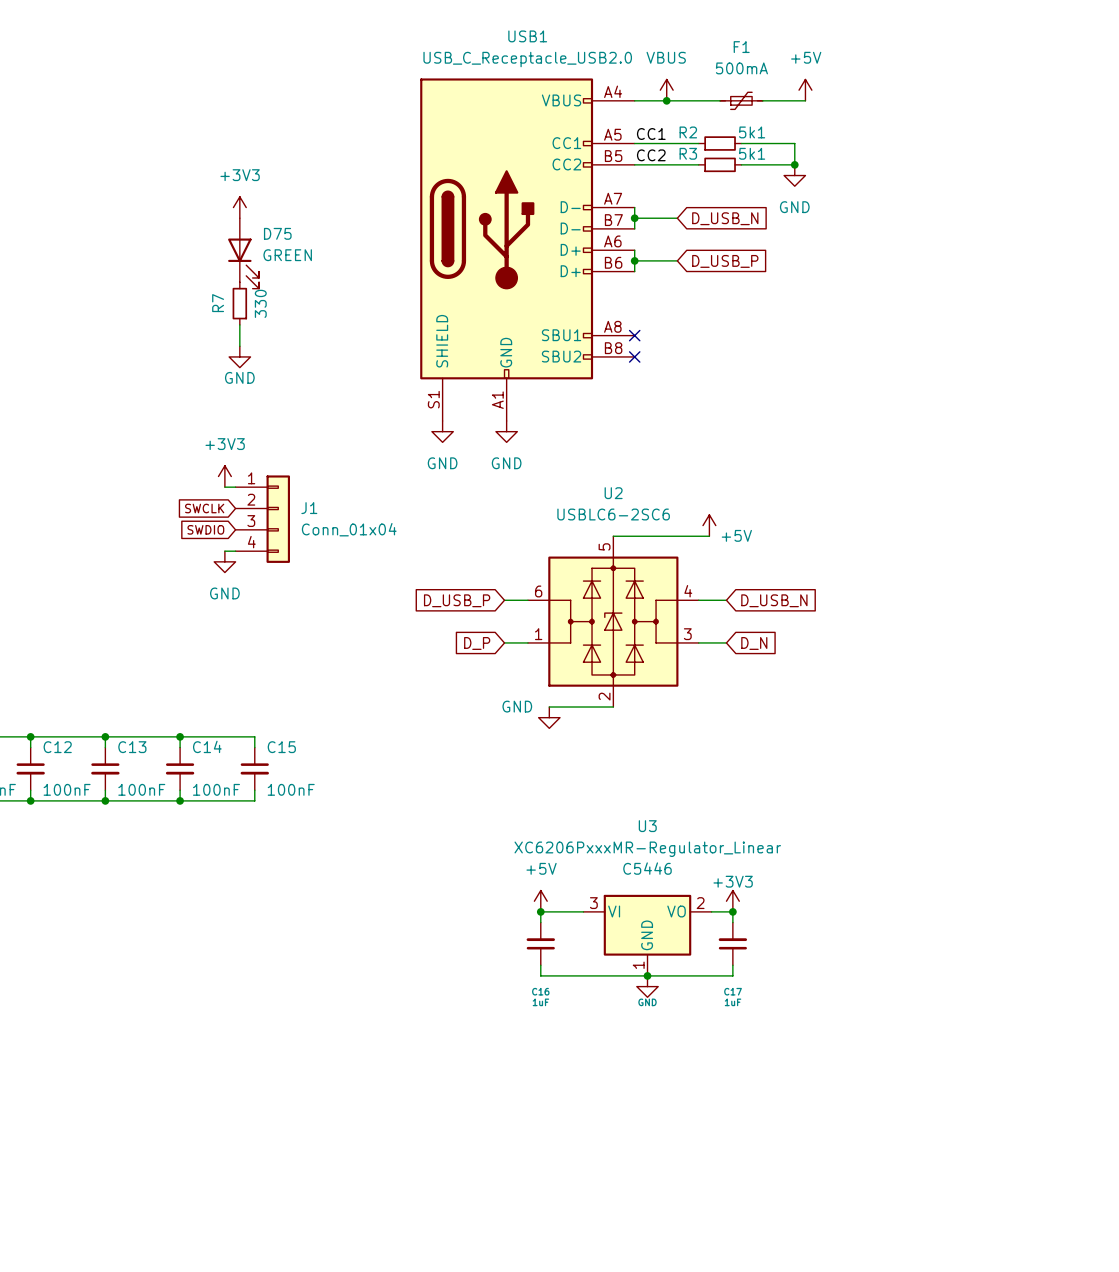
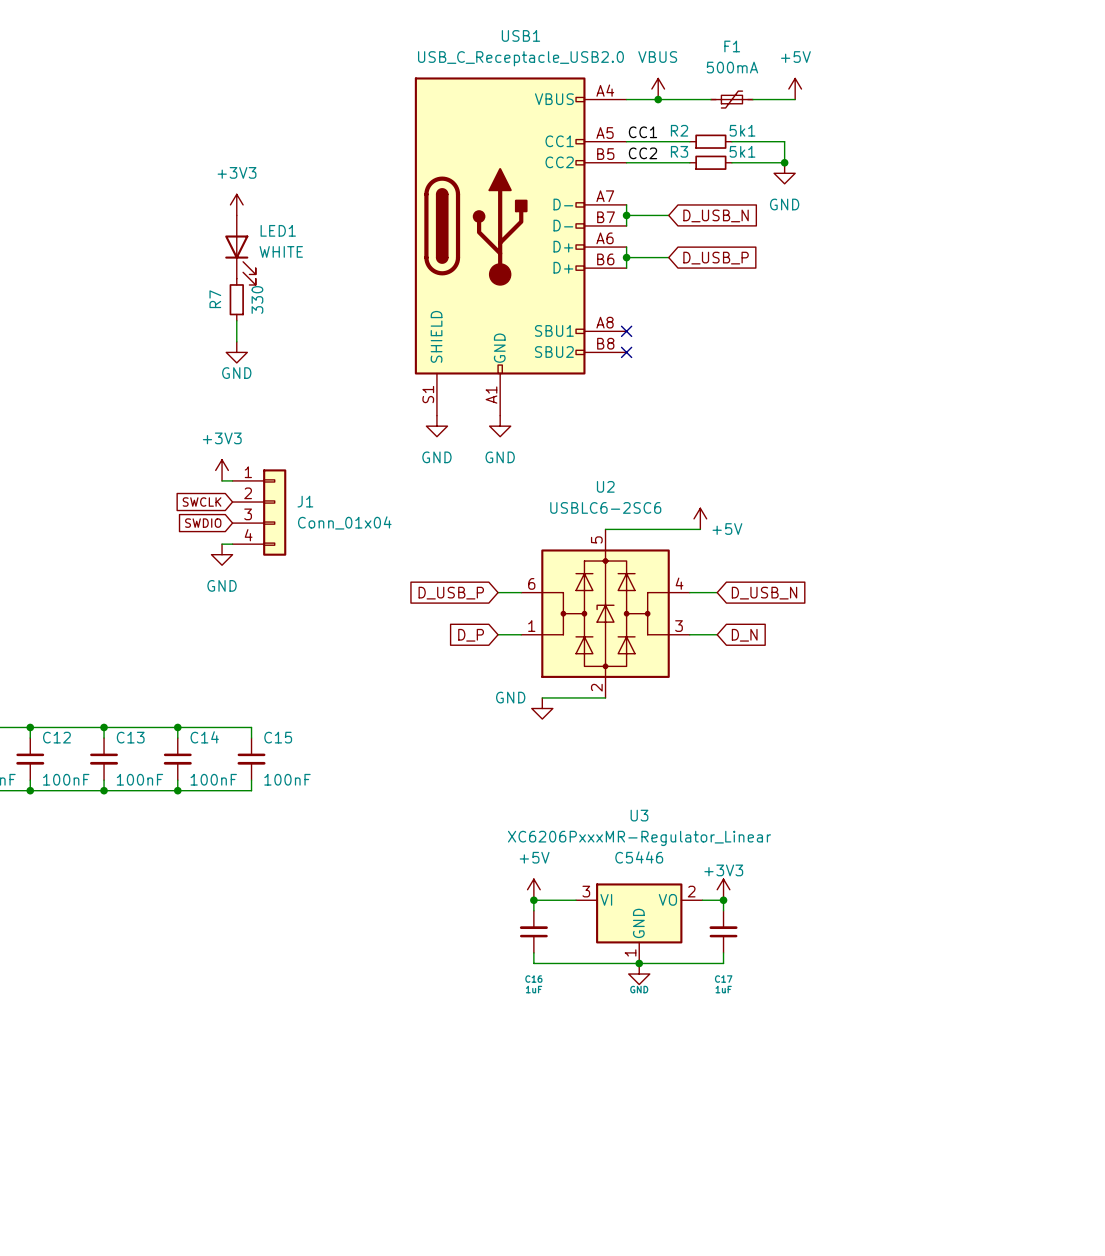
D75 name: D75 (277, 233) -> LED1 (278, 230)
D75 value: GREEN (287, 255) -> WHITE (281, 251)

